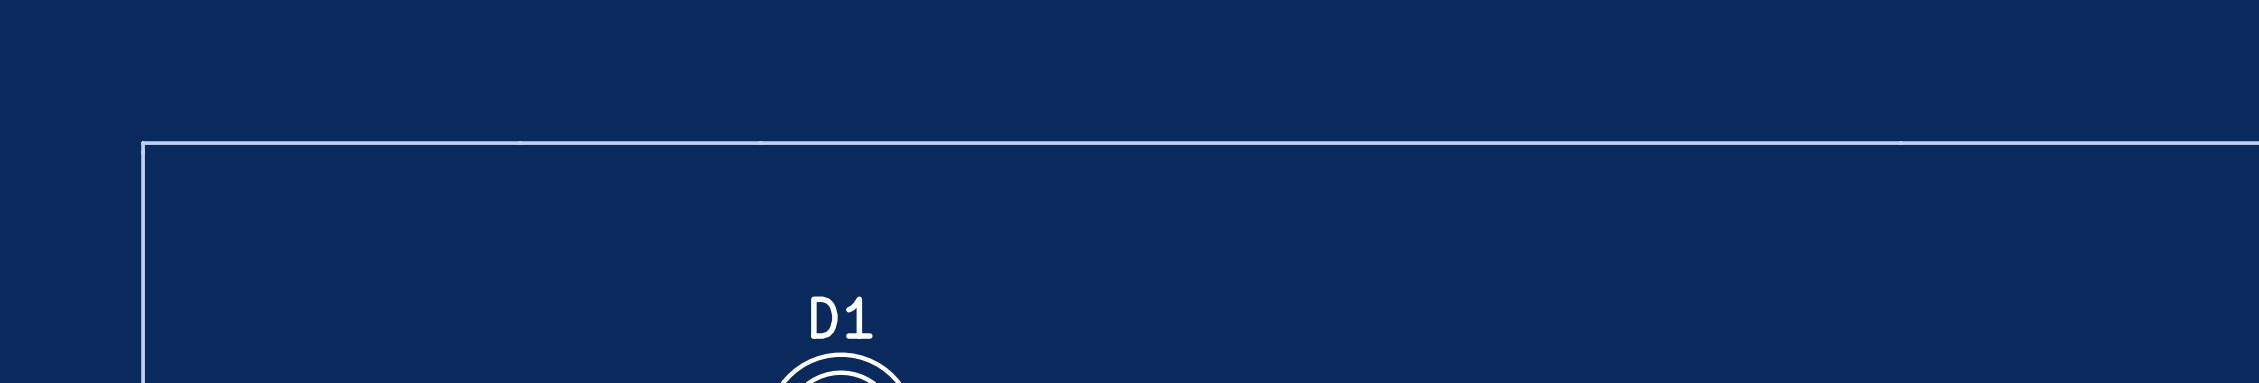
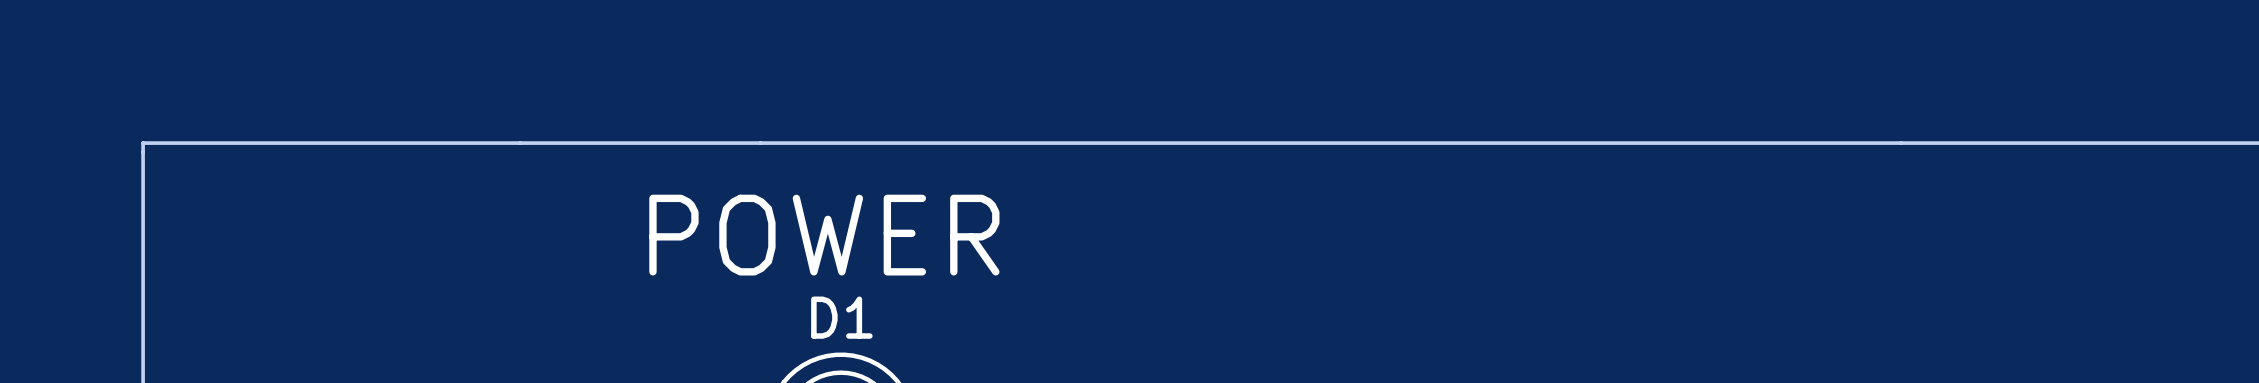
text: none -> POWER (824, 235)

